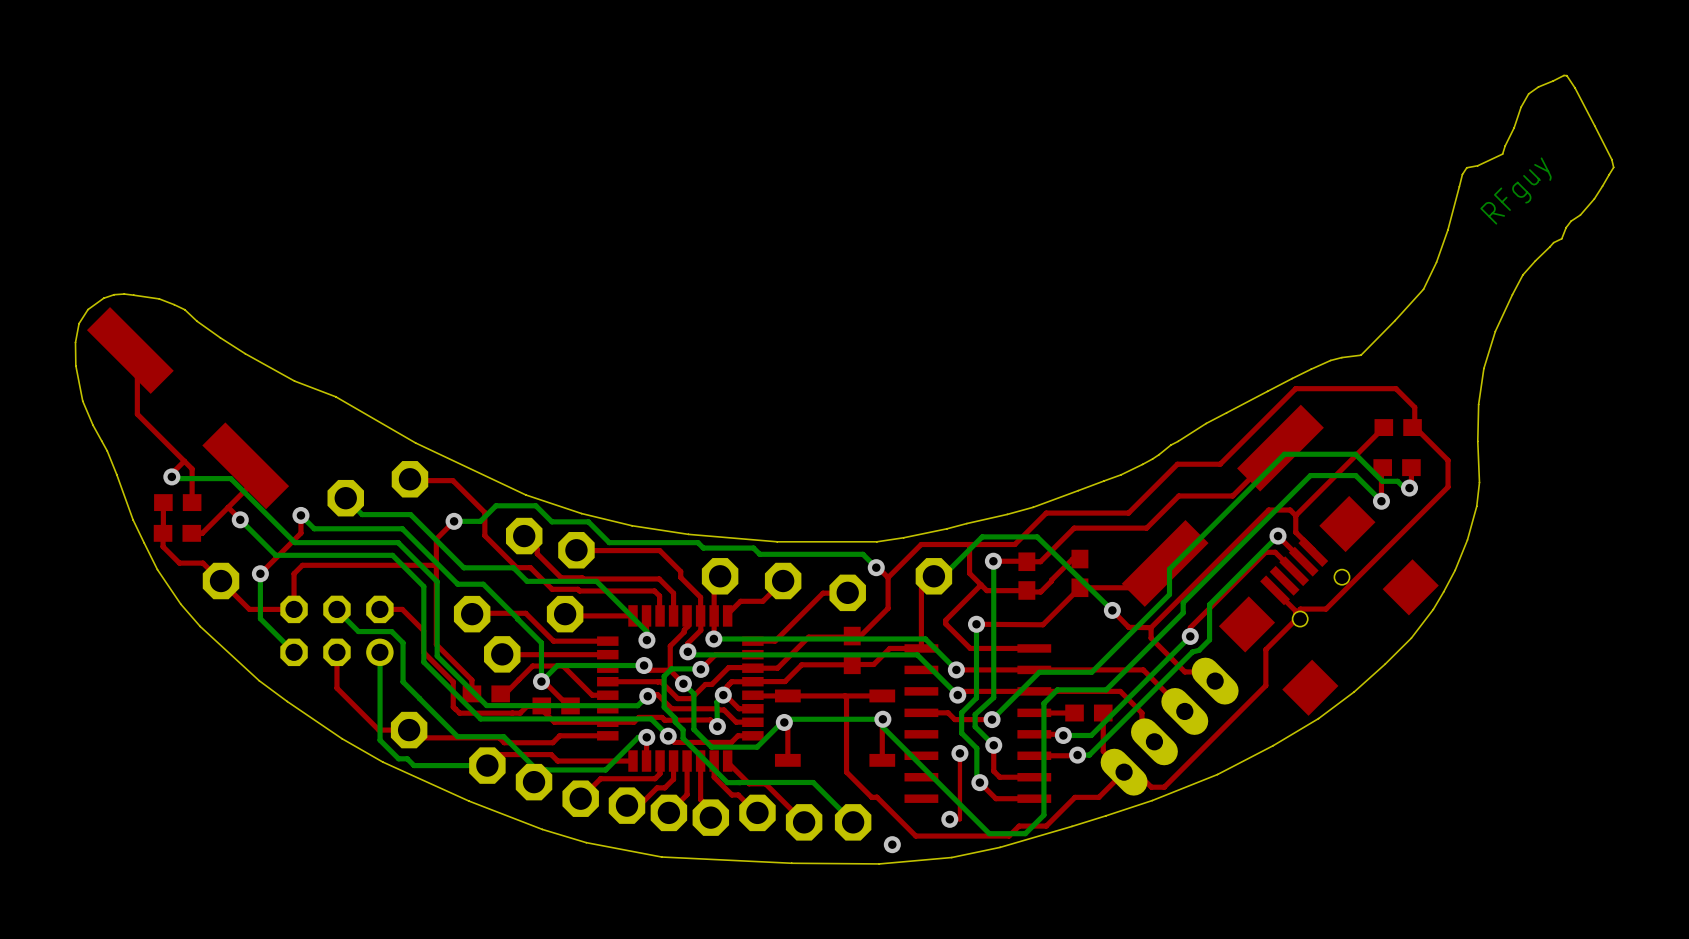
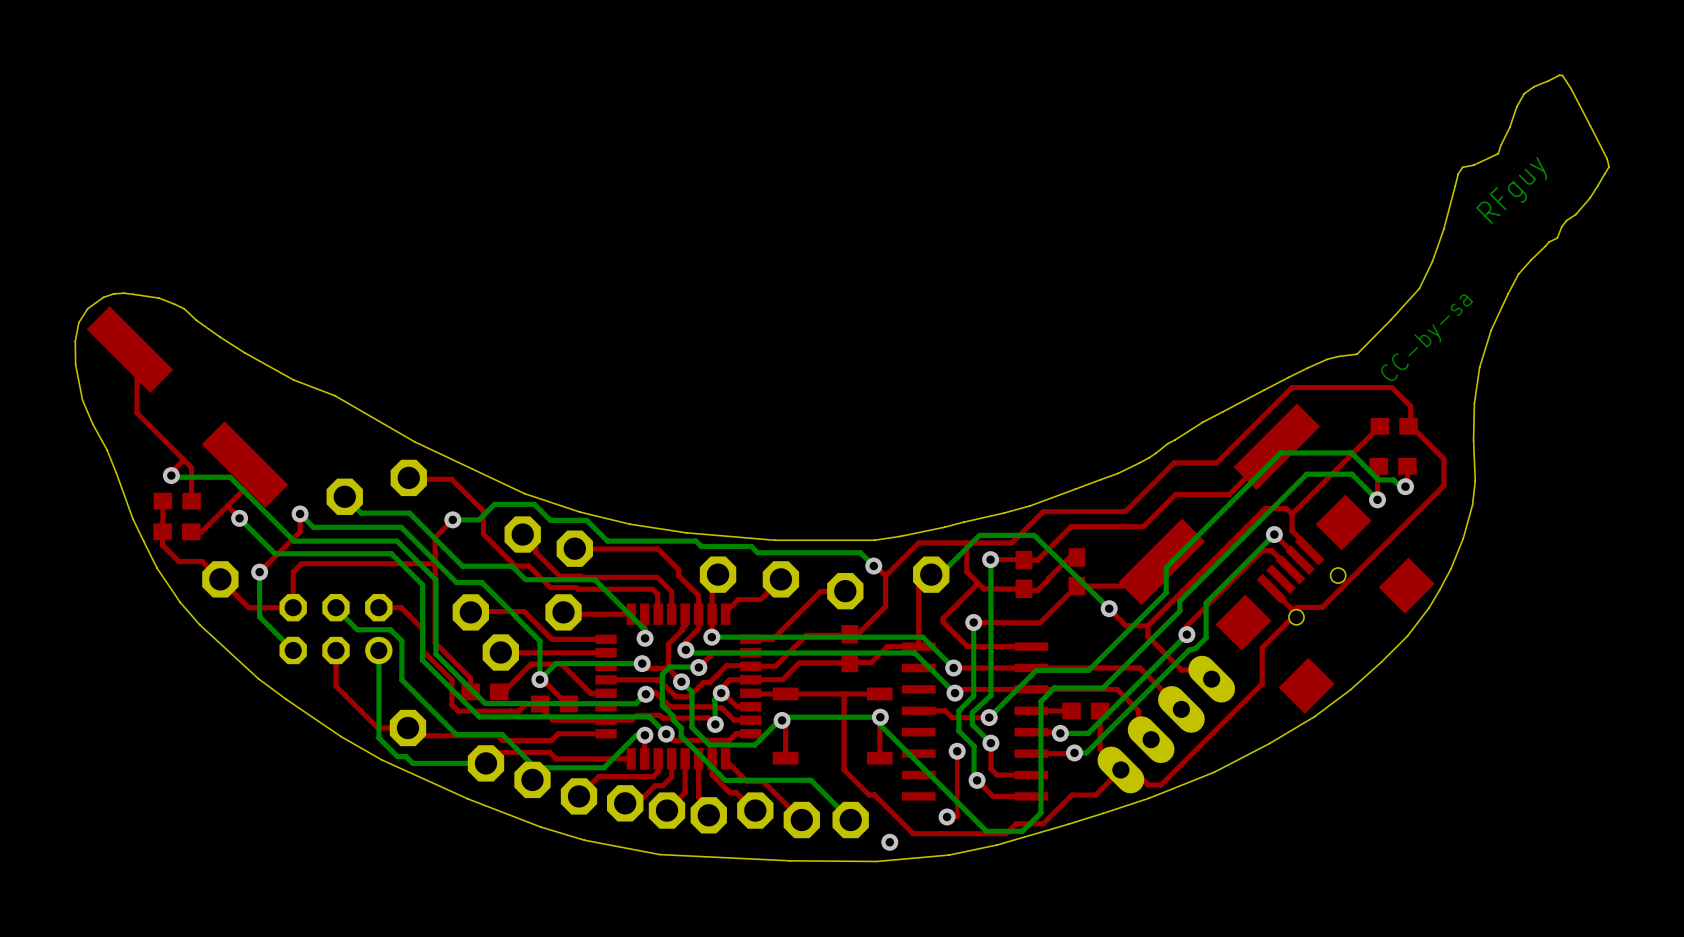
text: none -> CC-by-sa (1427, 337)

